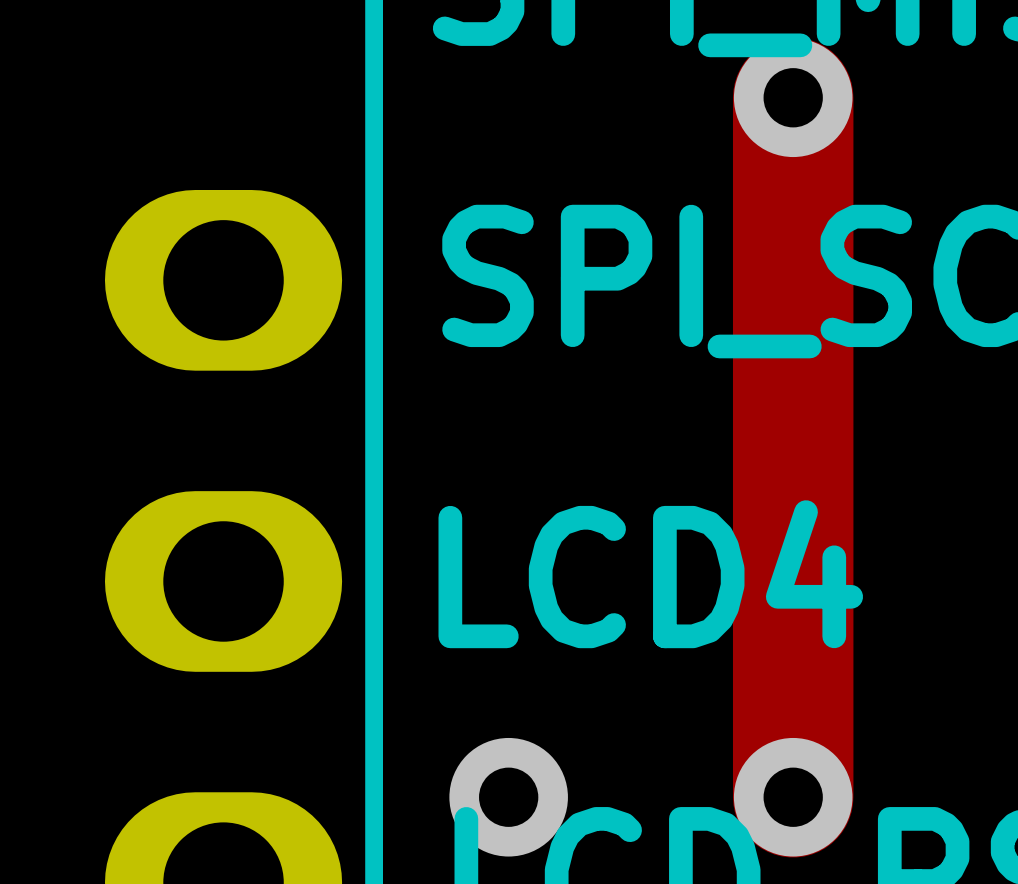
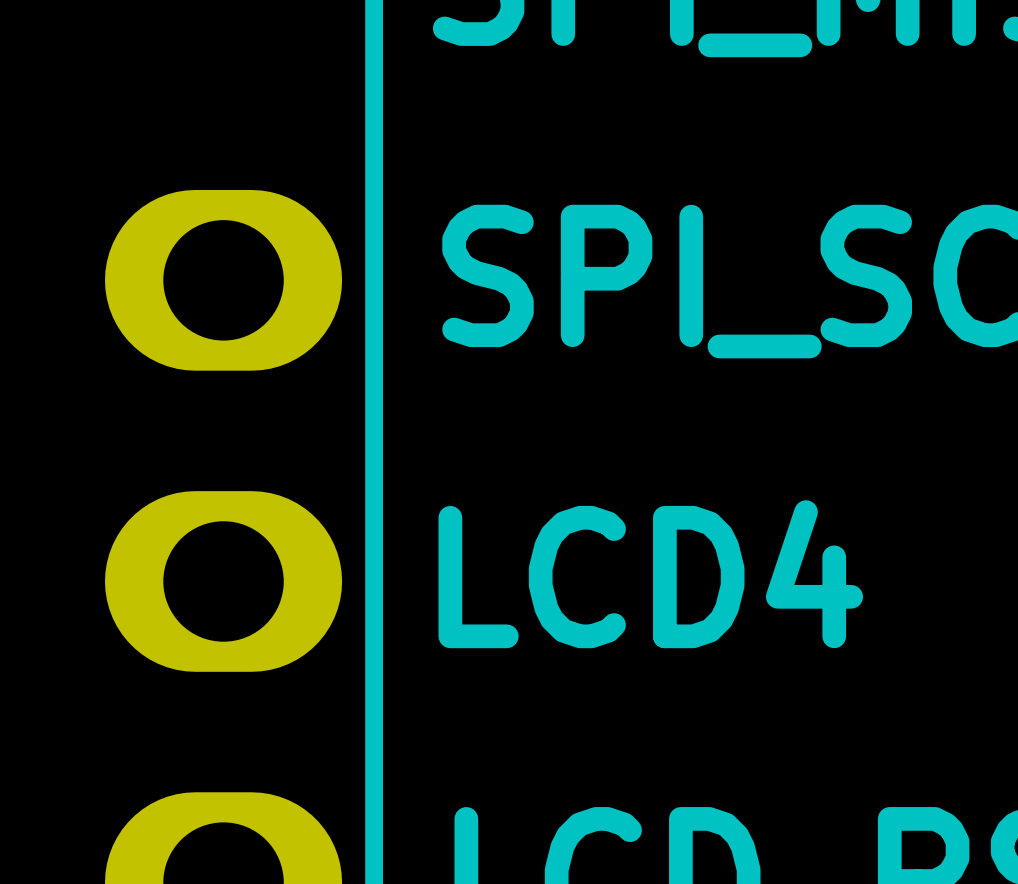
track: (793, 97) (793, 797) -> none
via: (793, 97) -> none
via: (508, 797) -> none
via: (793, 797) -> none

